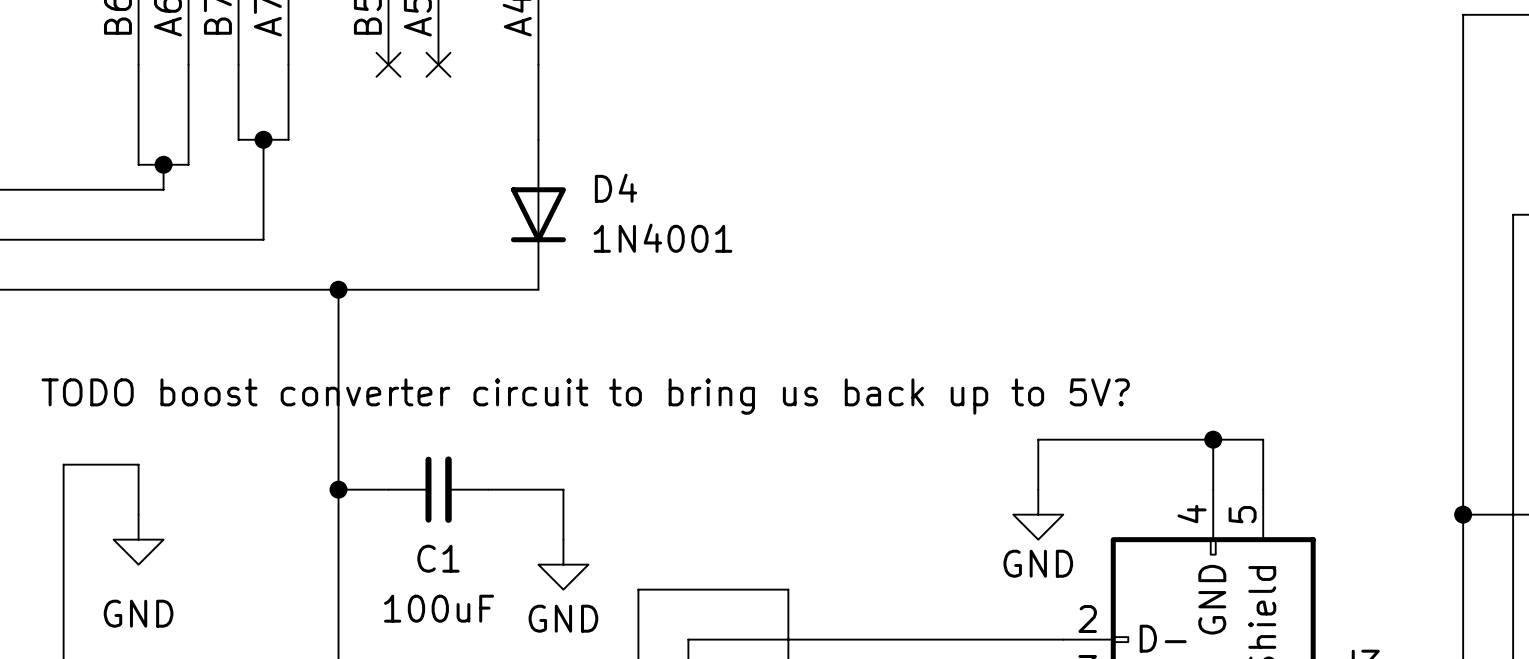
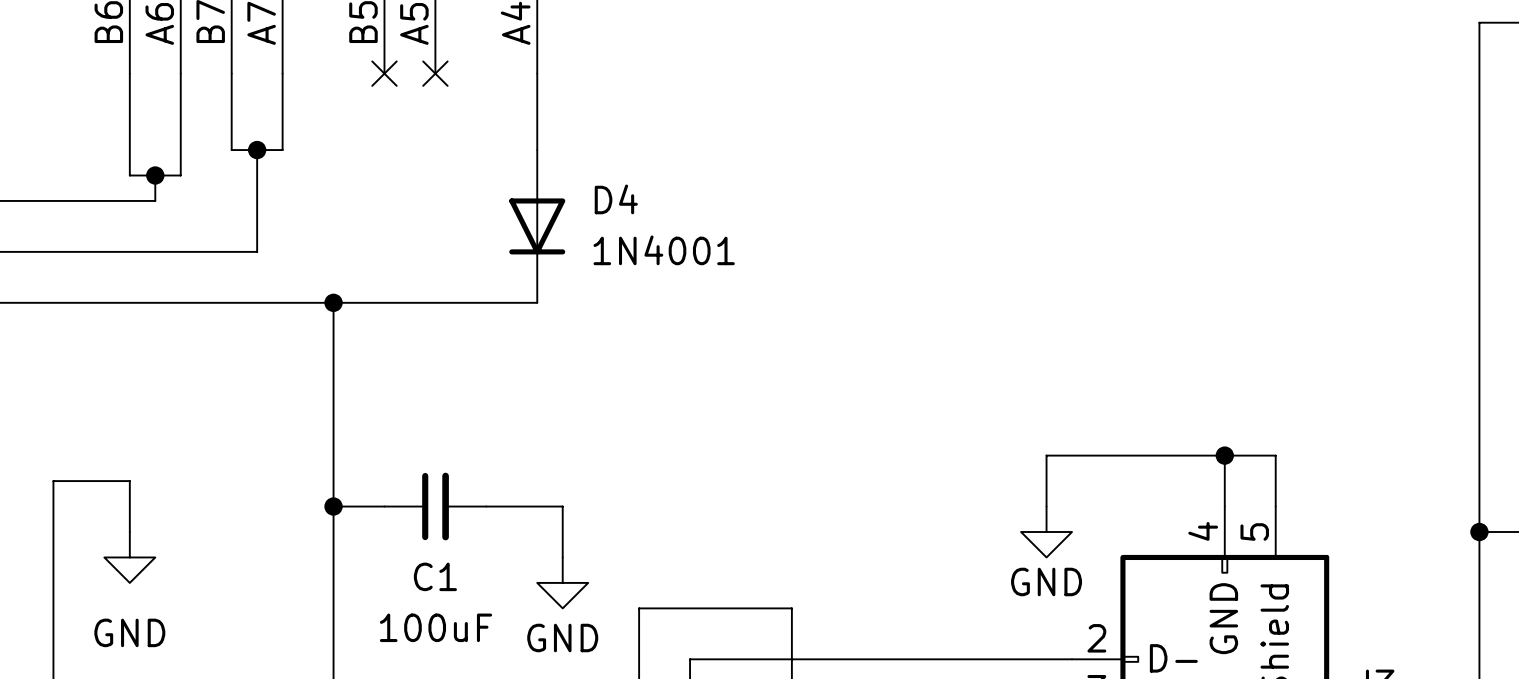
label: TODO boost converter circuit to bring us back up to 5V? (585, 396) -> none

